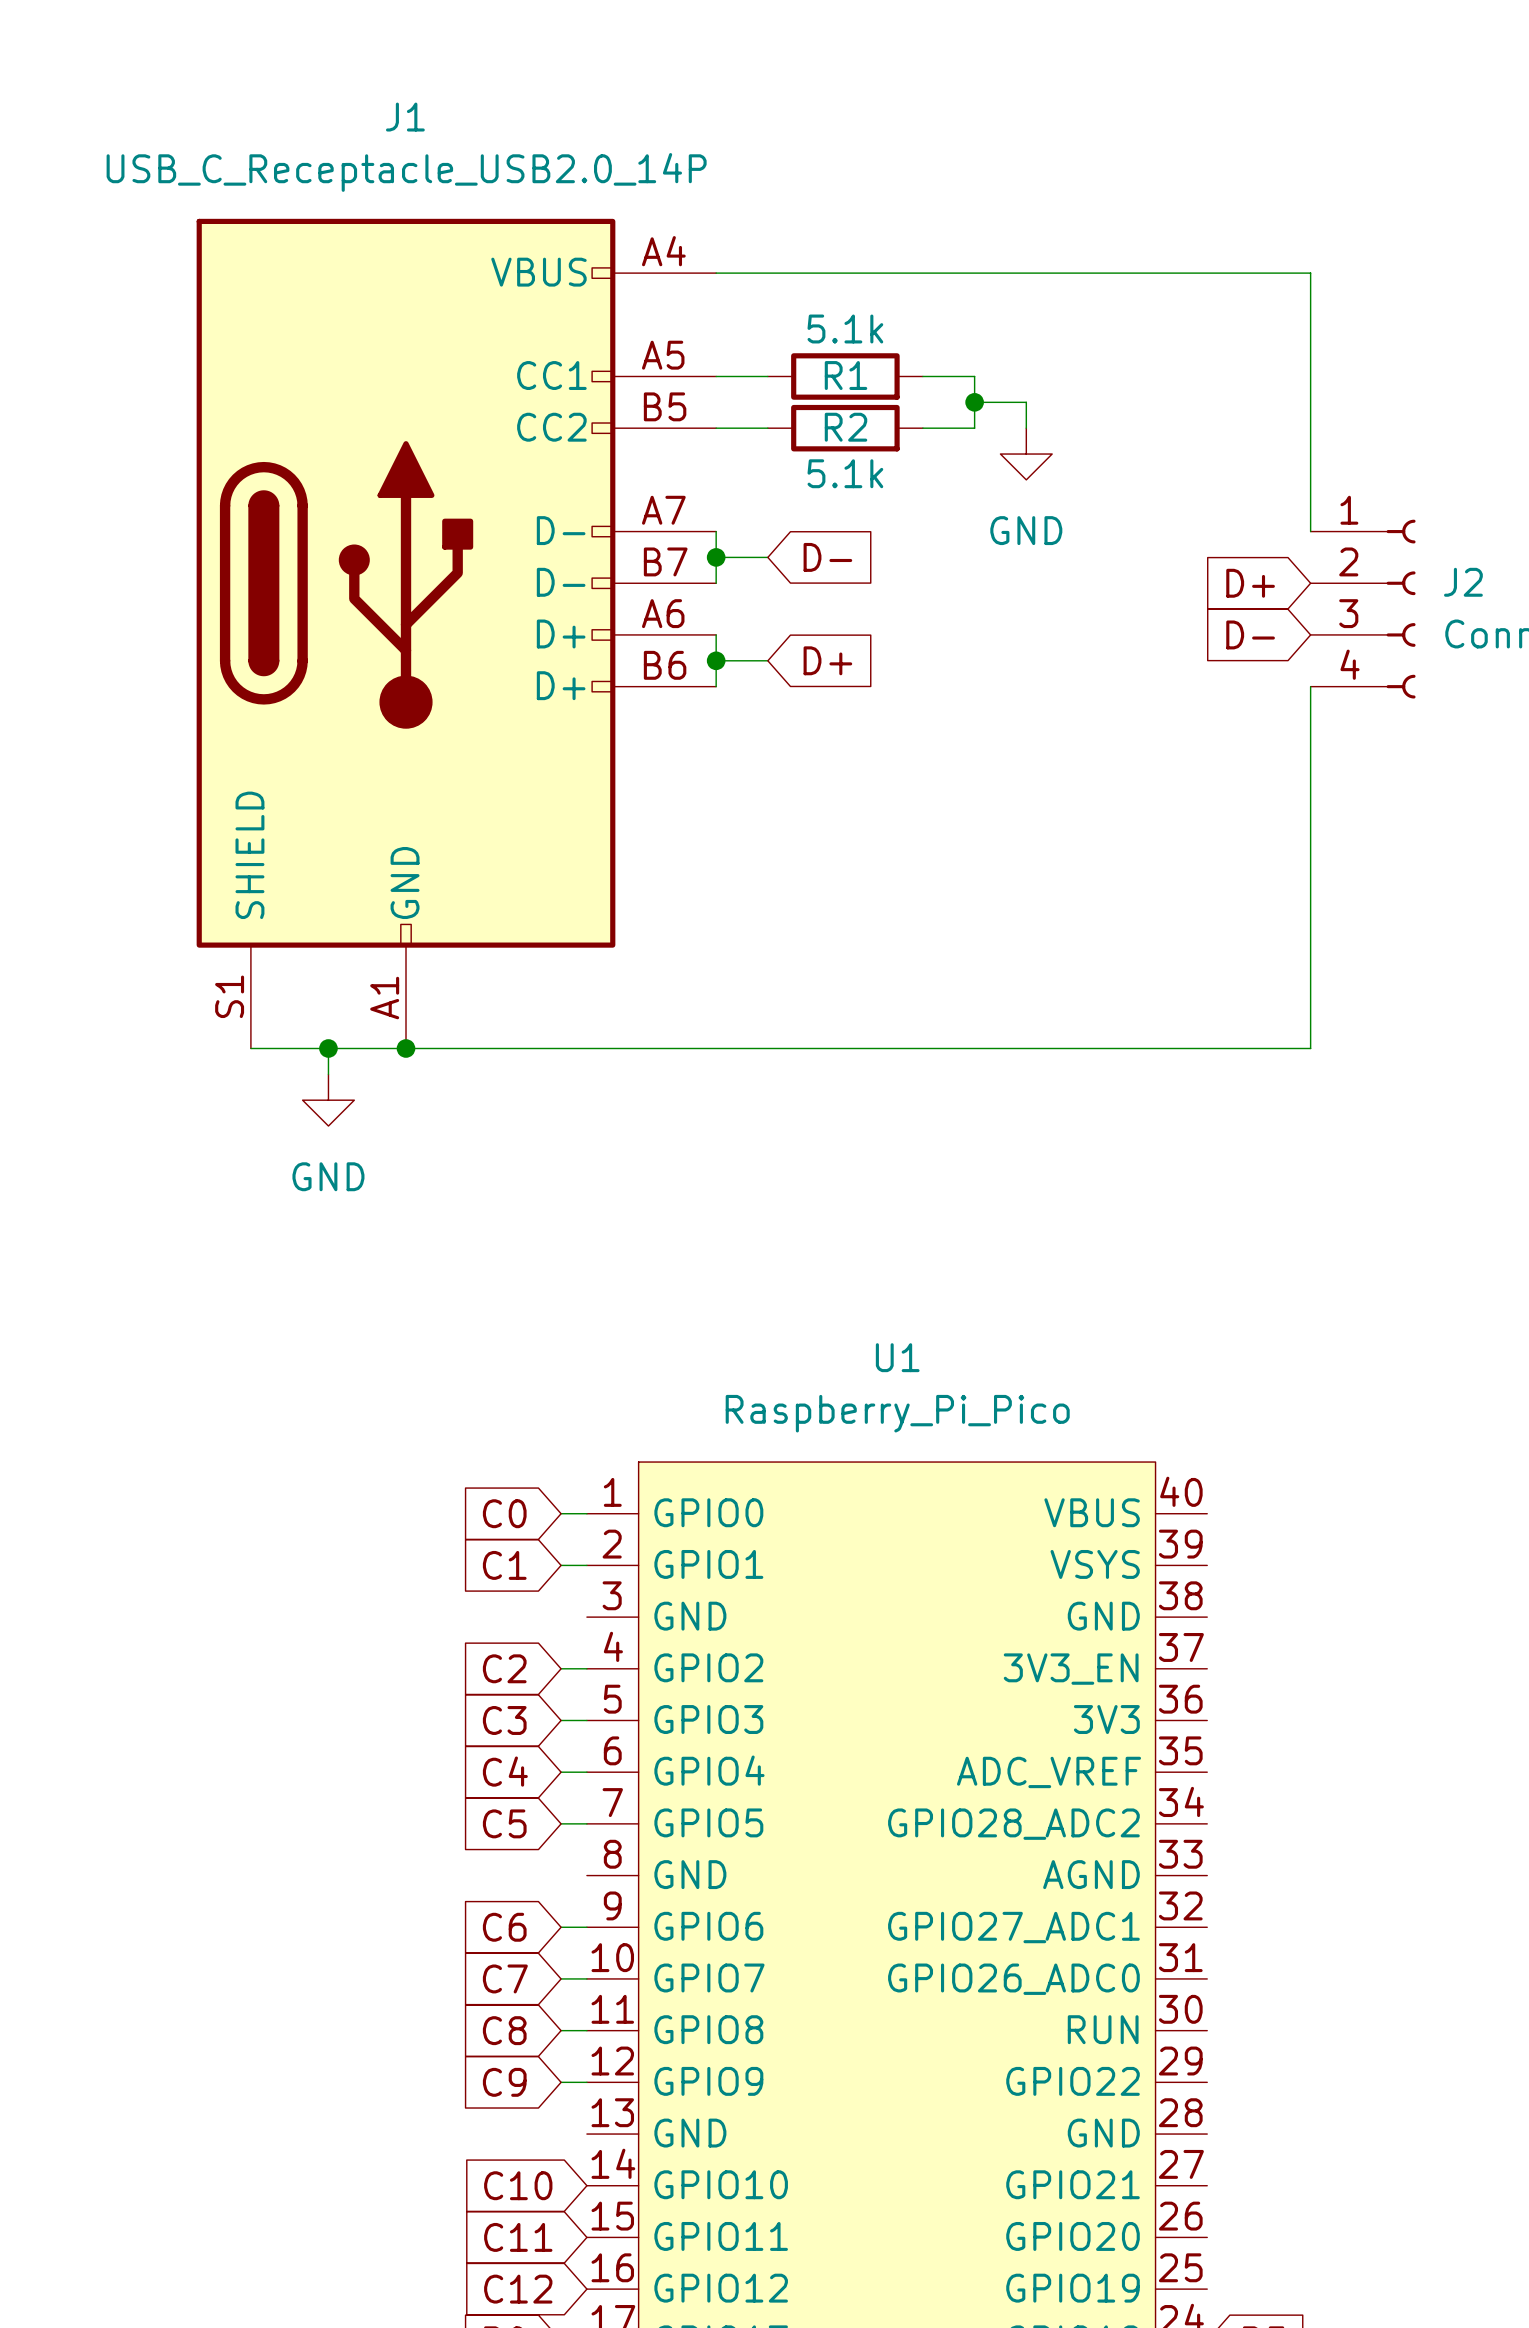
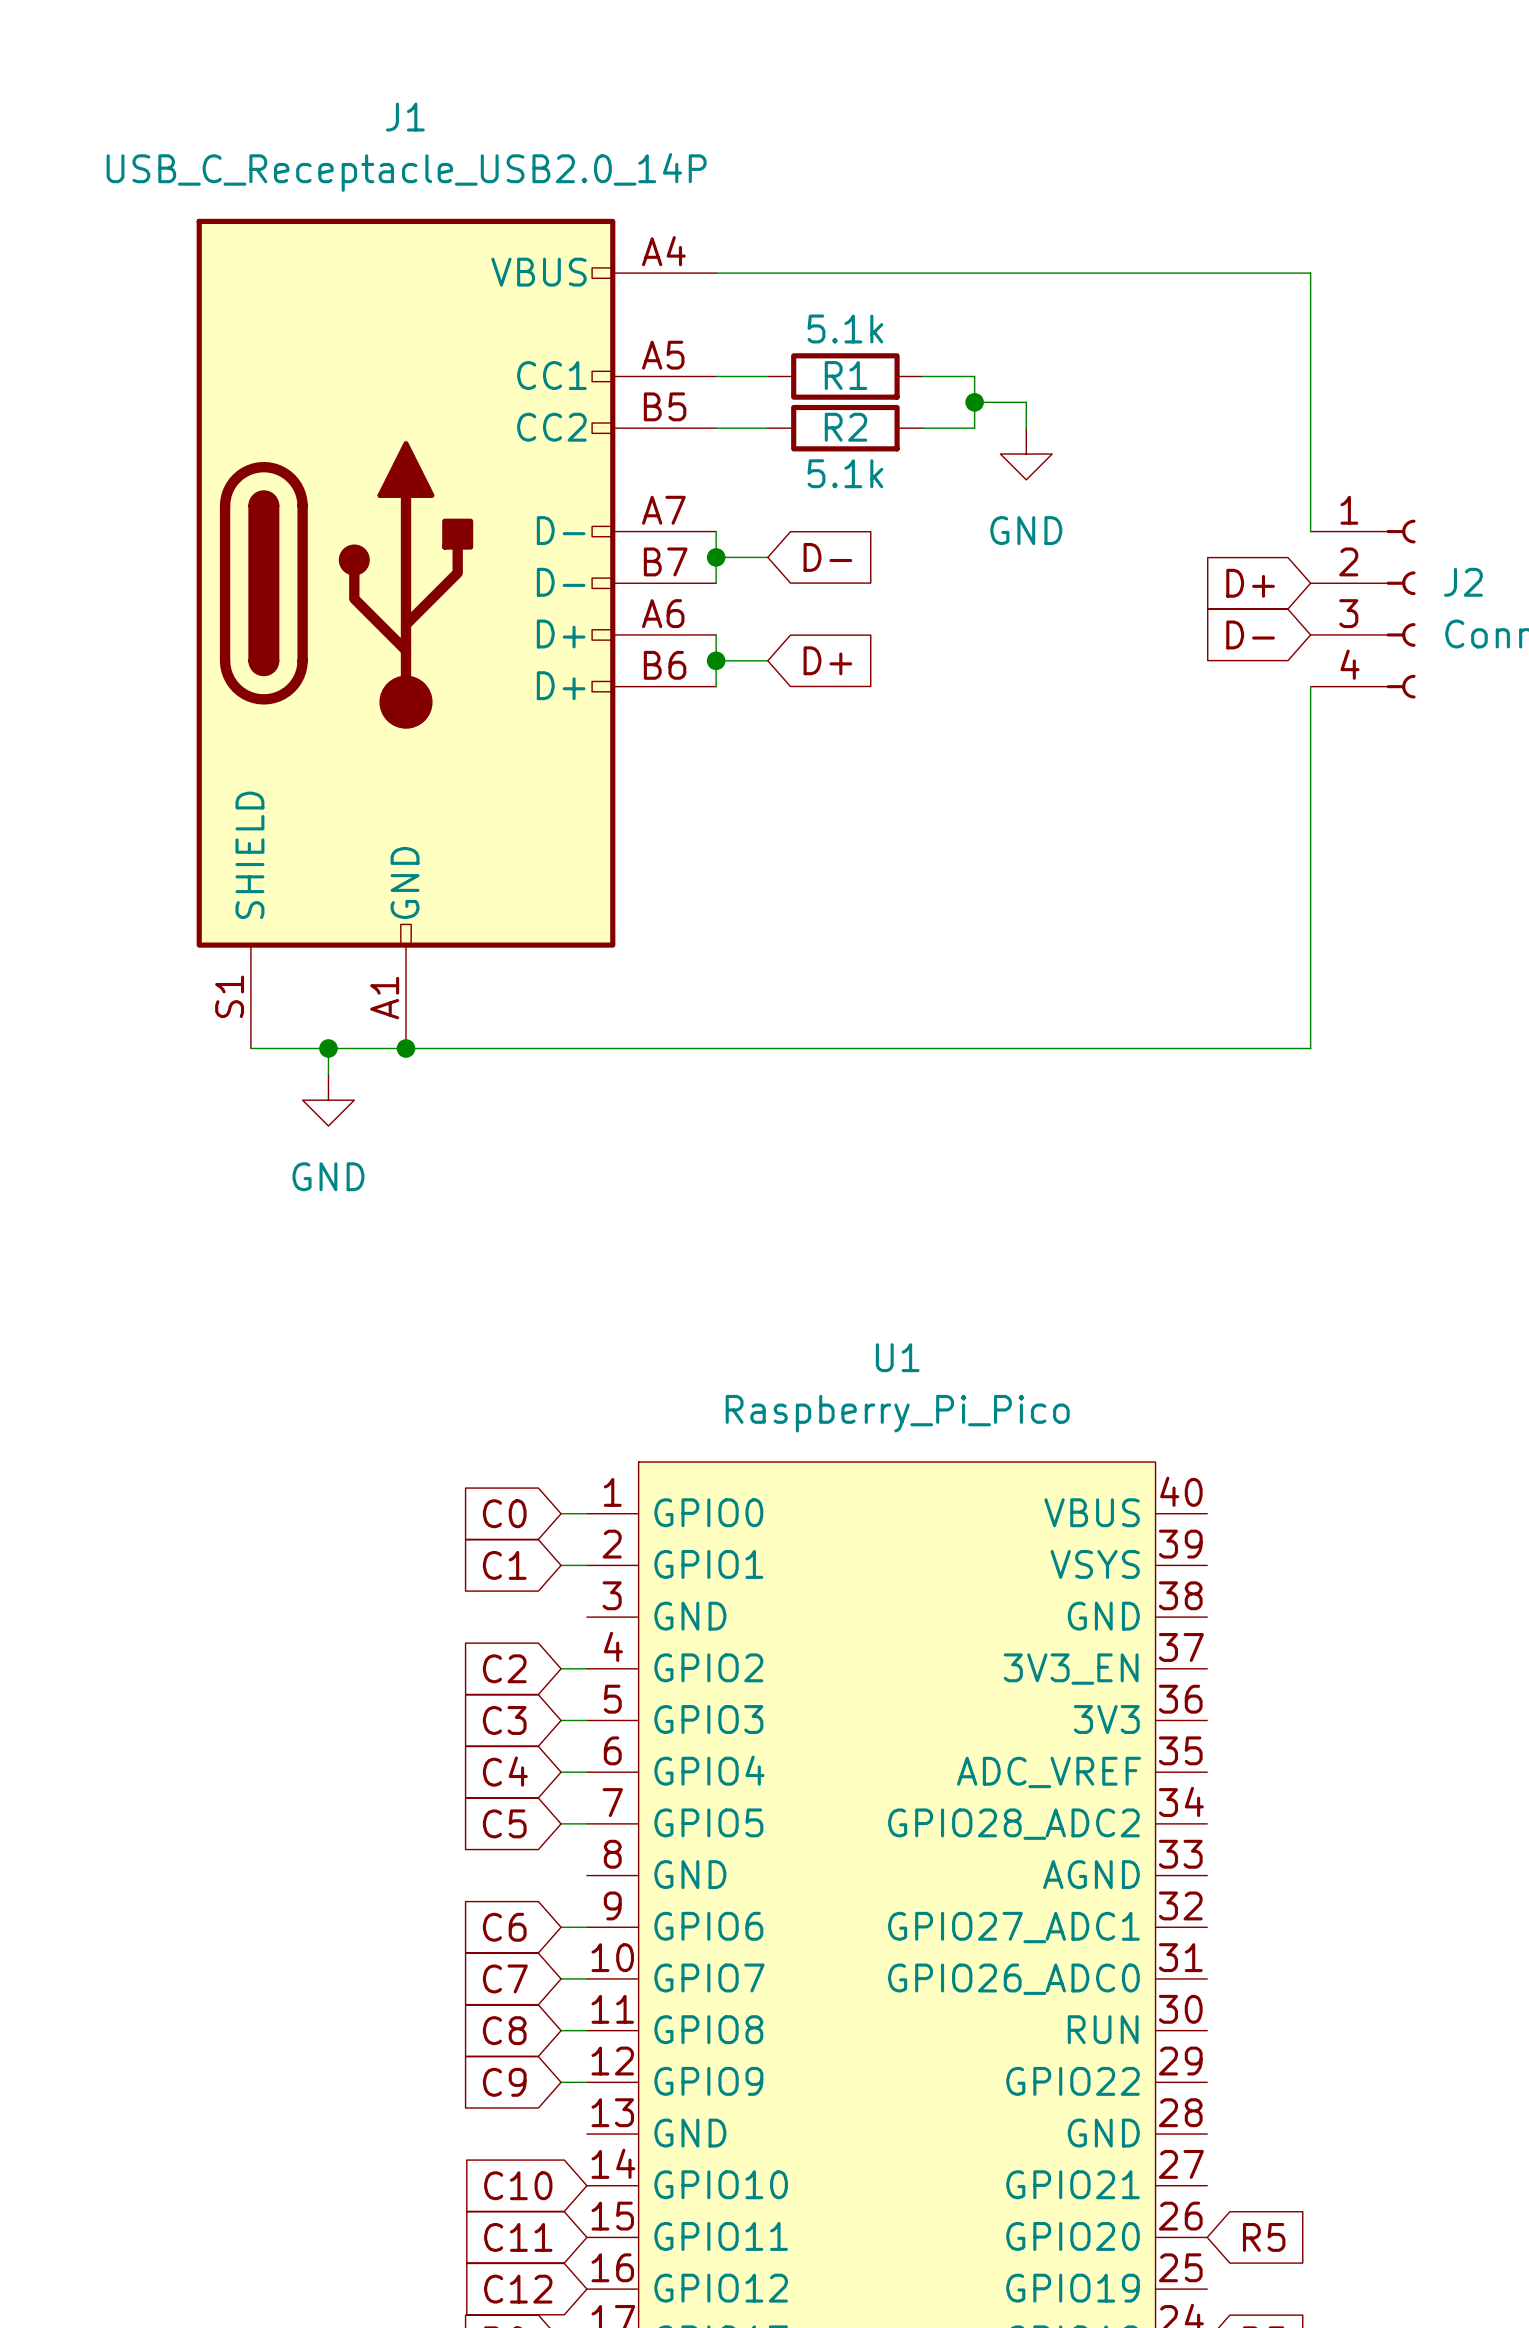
global label: none -> R5 (1264, 2237)

